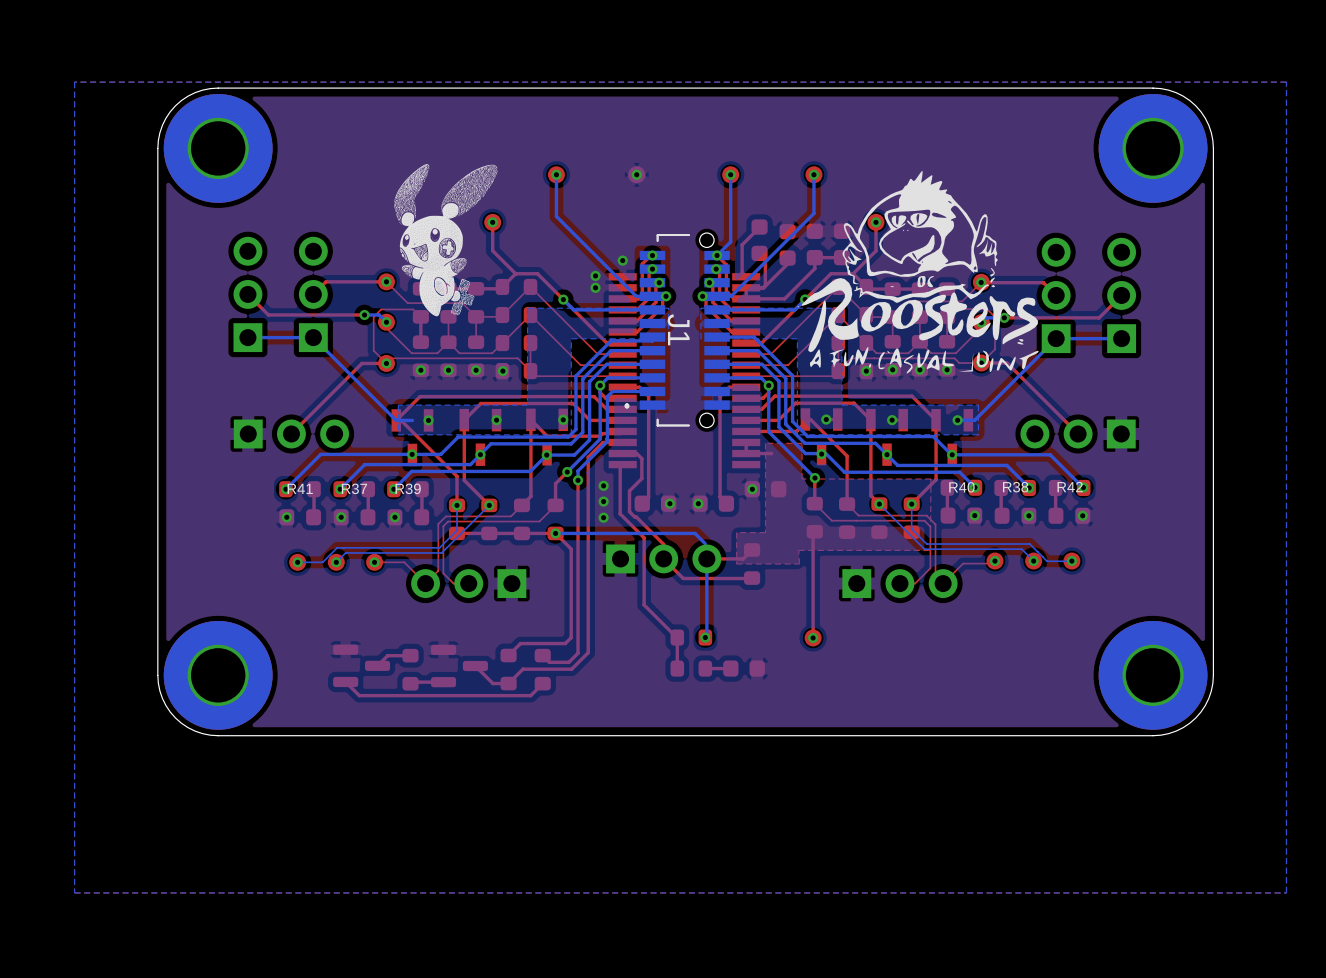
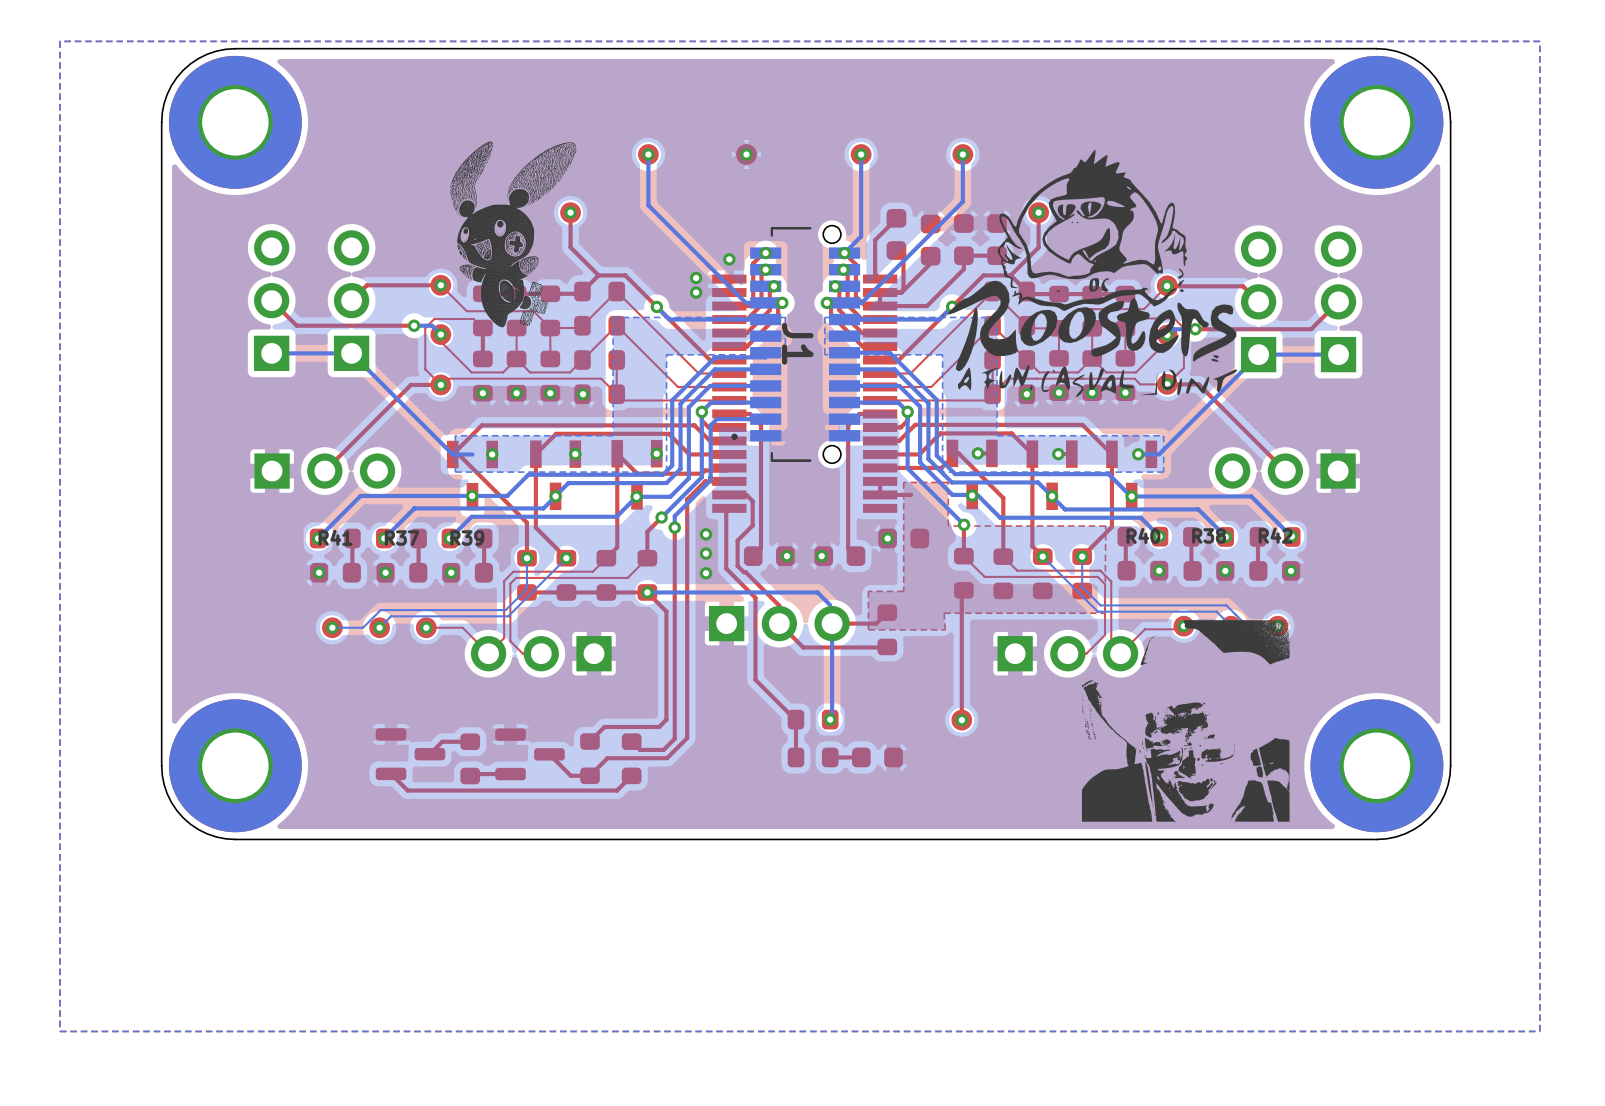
drawing: none -> [1081, 620, 1290, 822]

